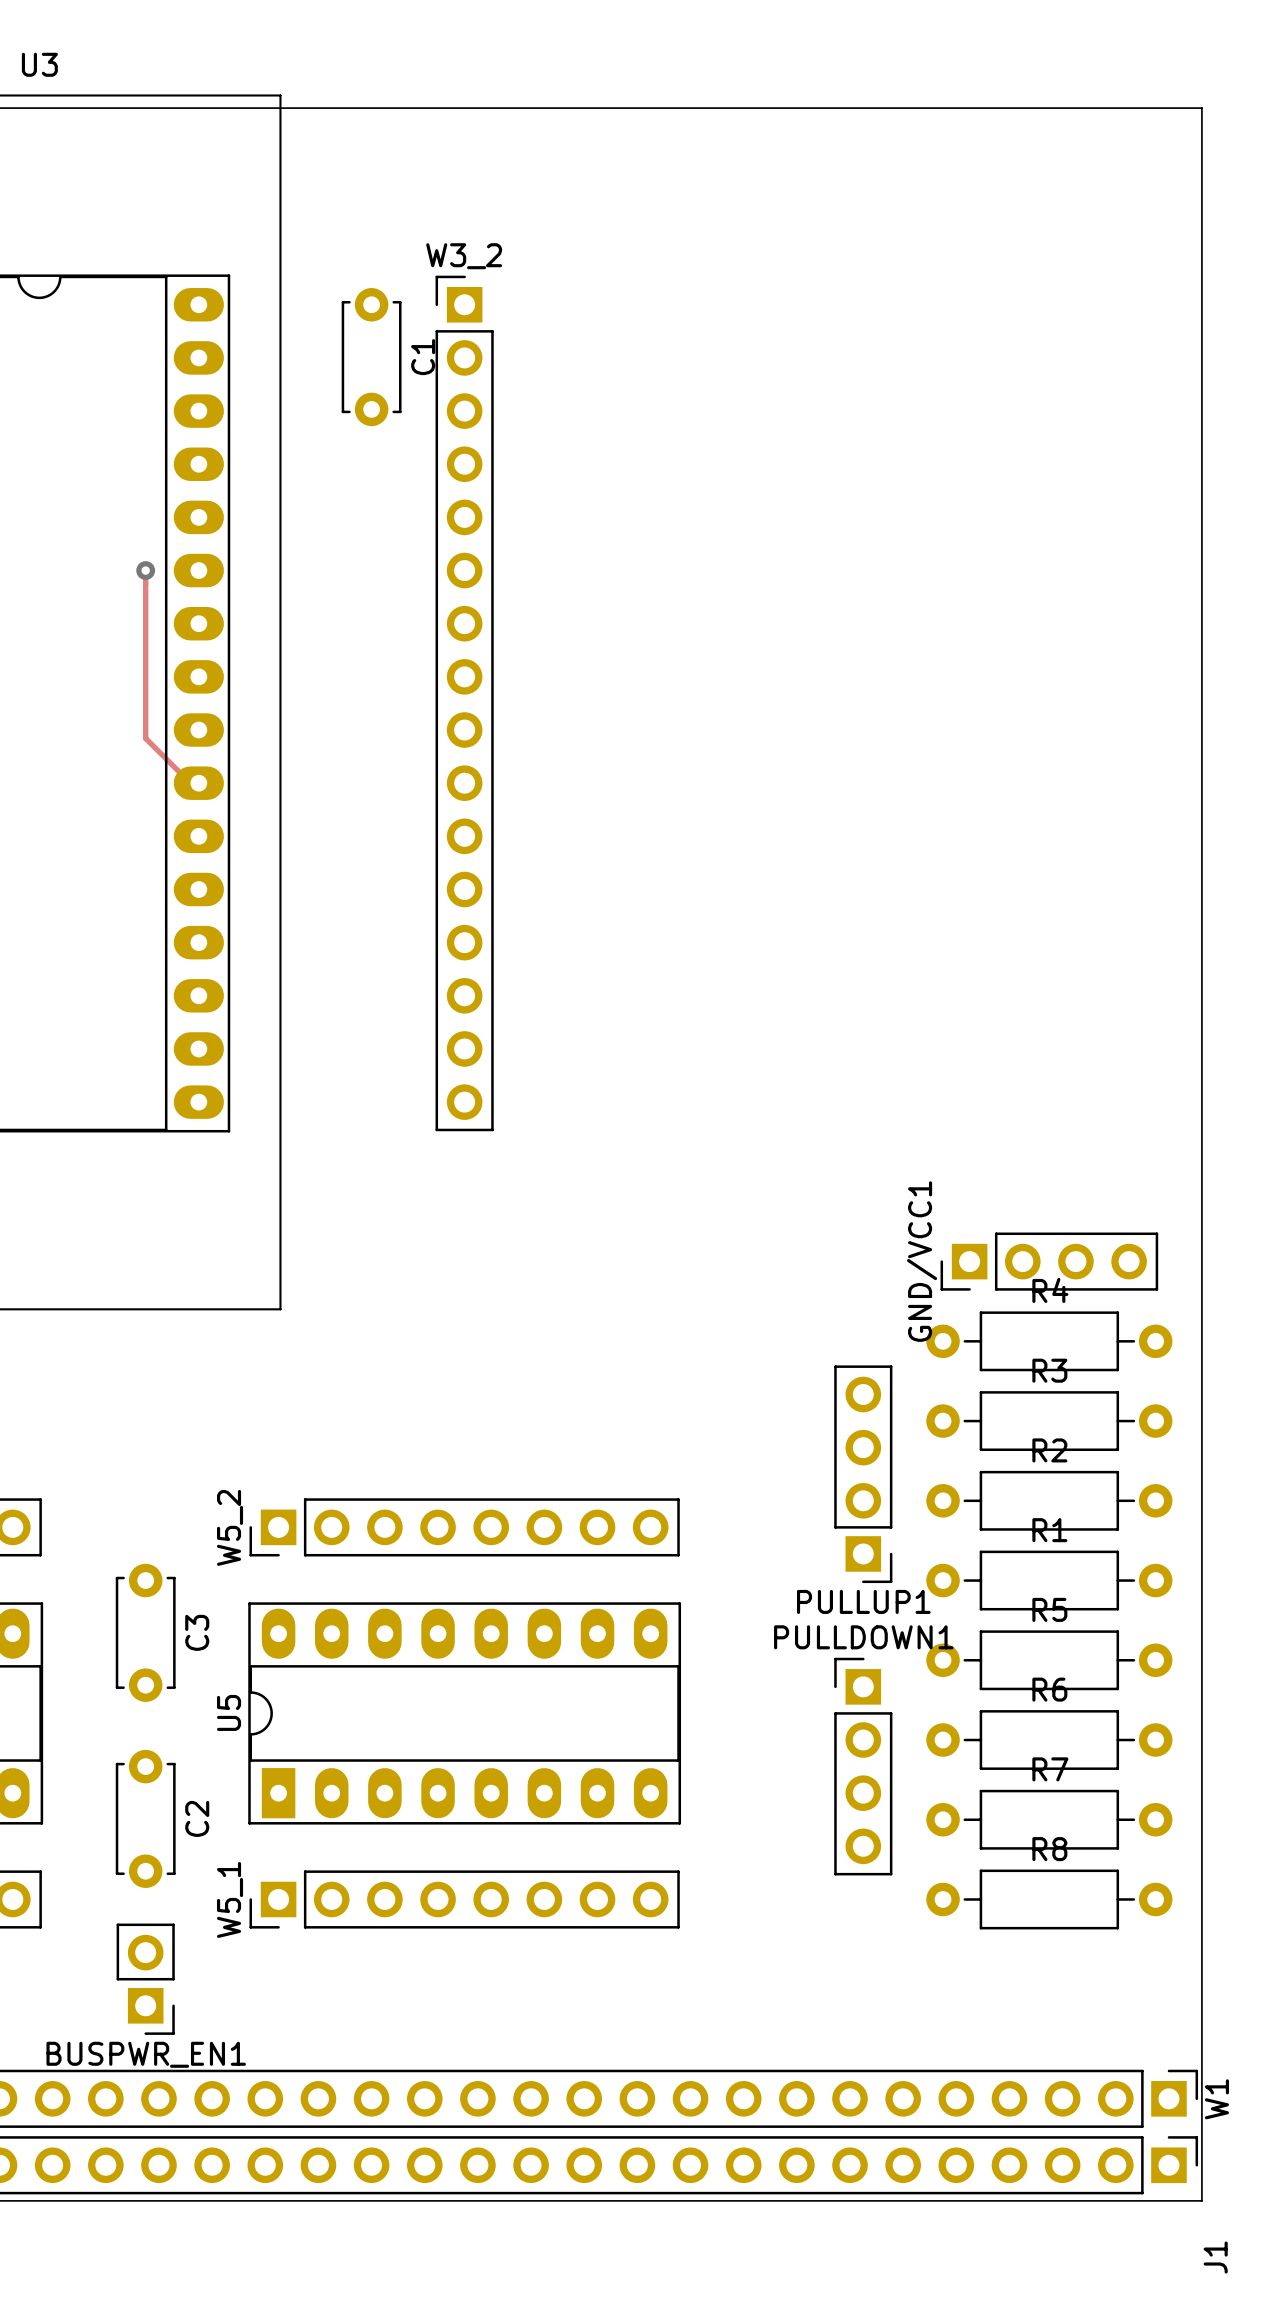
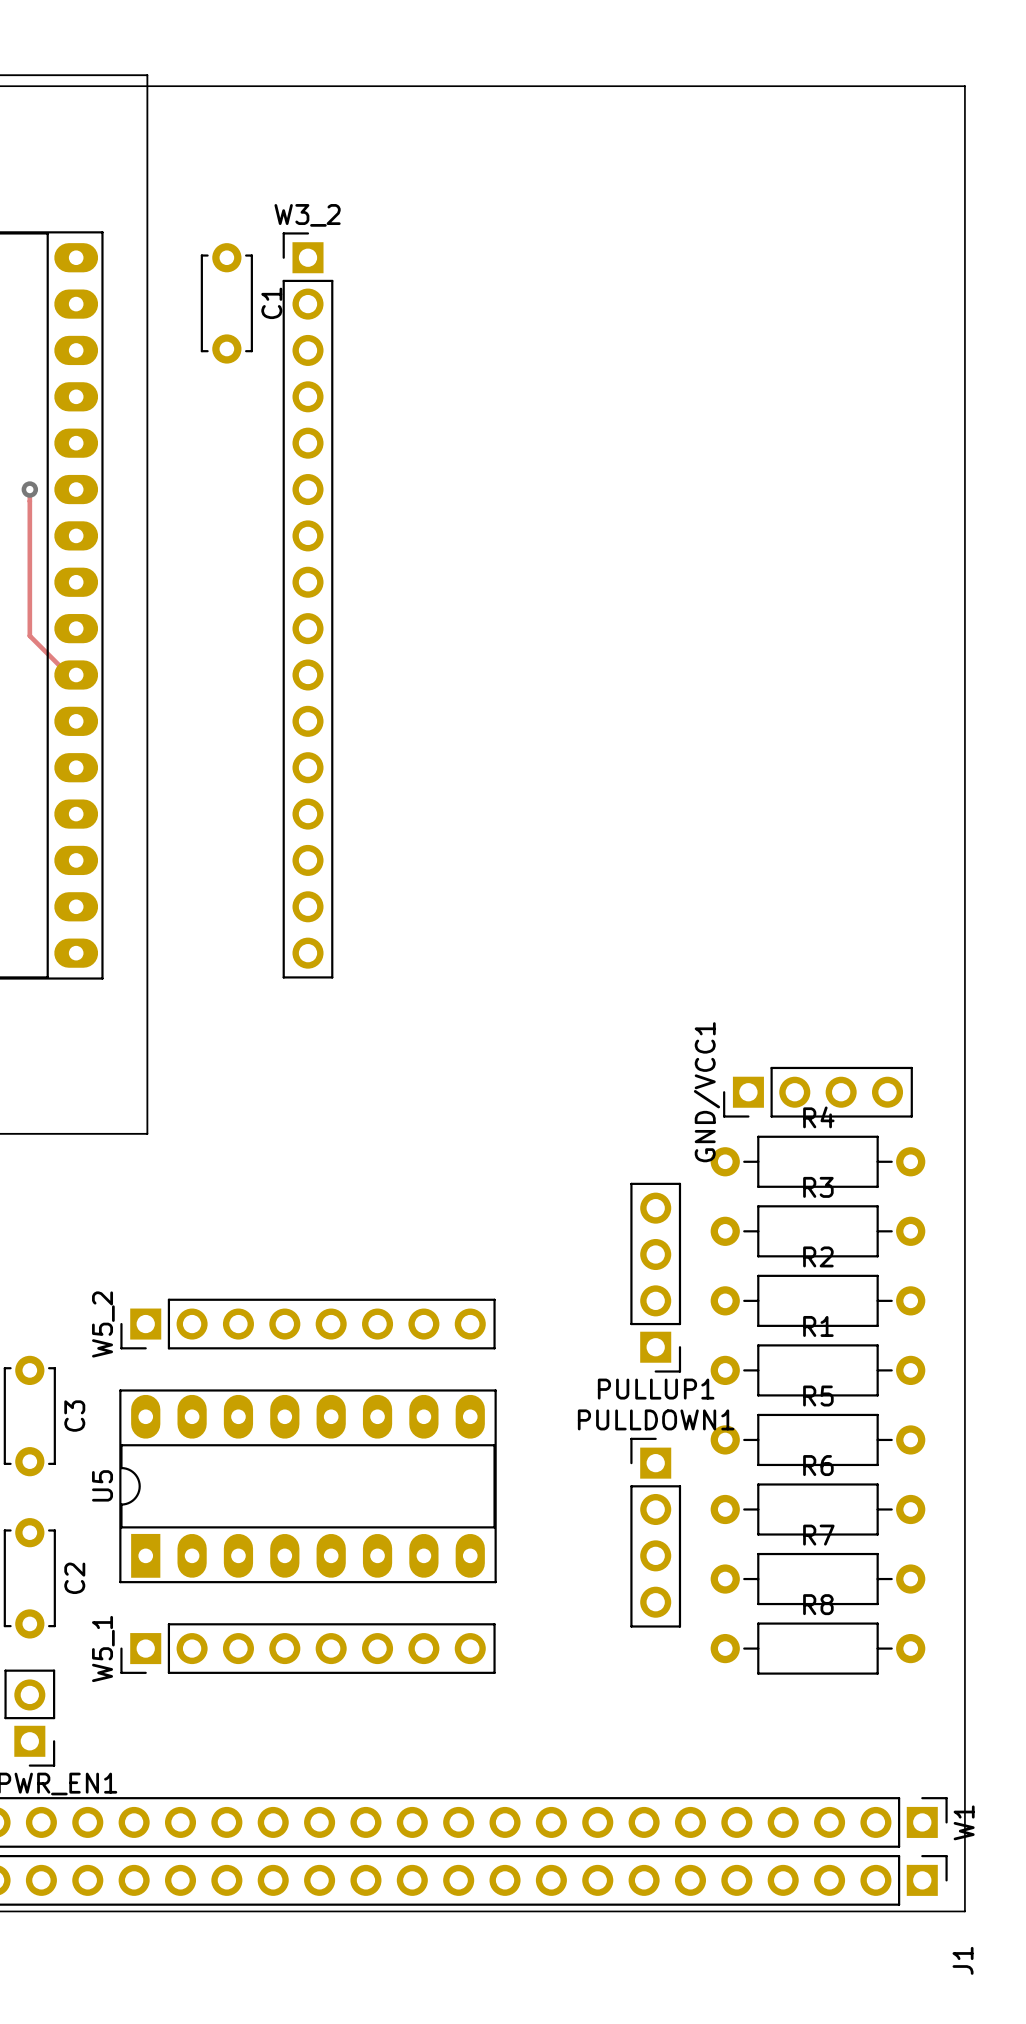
board edge: (1201, 108) (1201, 2200) -> (951, 86) (964, 86) (964, 1911) (951, 1911)

